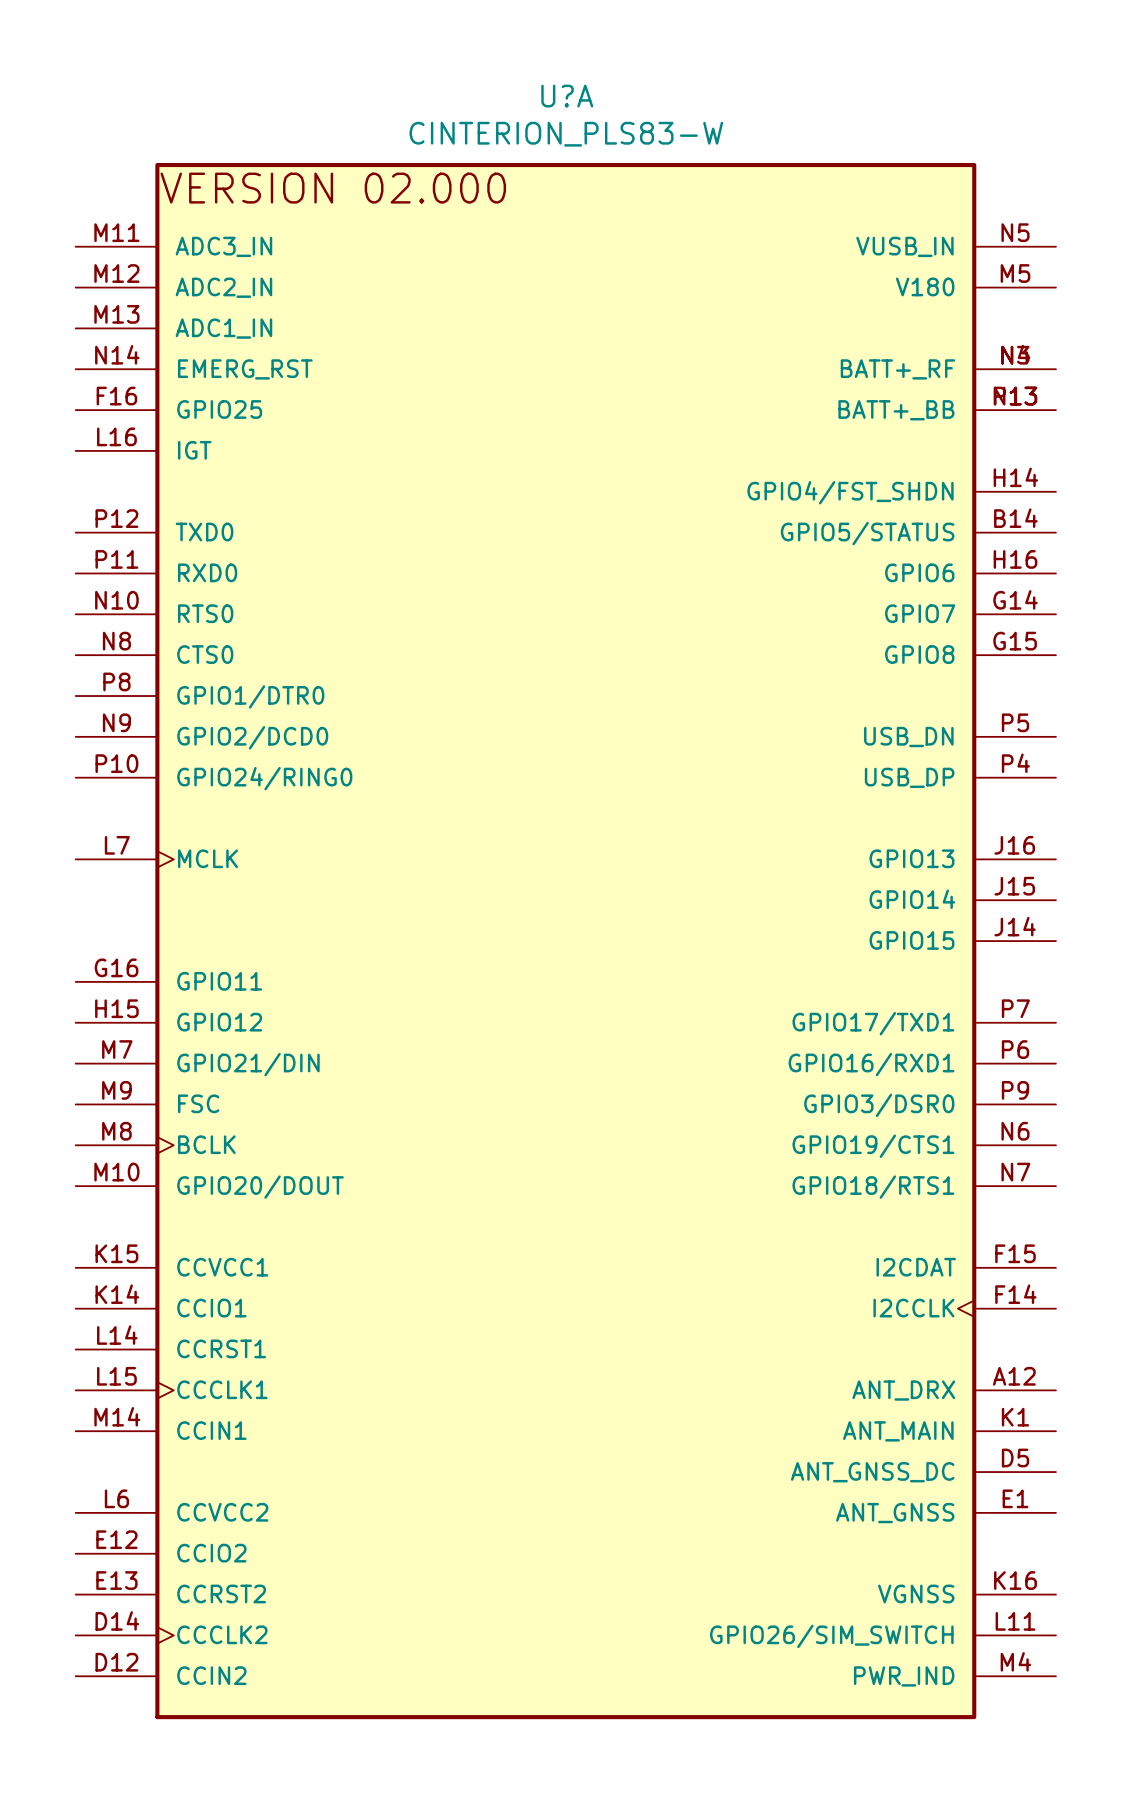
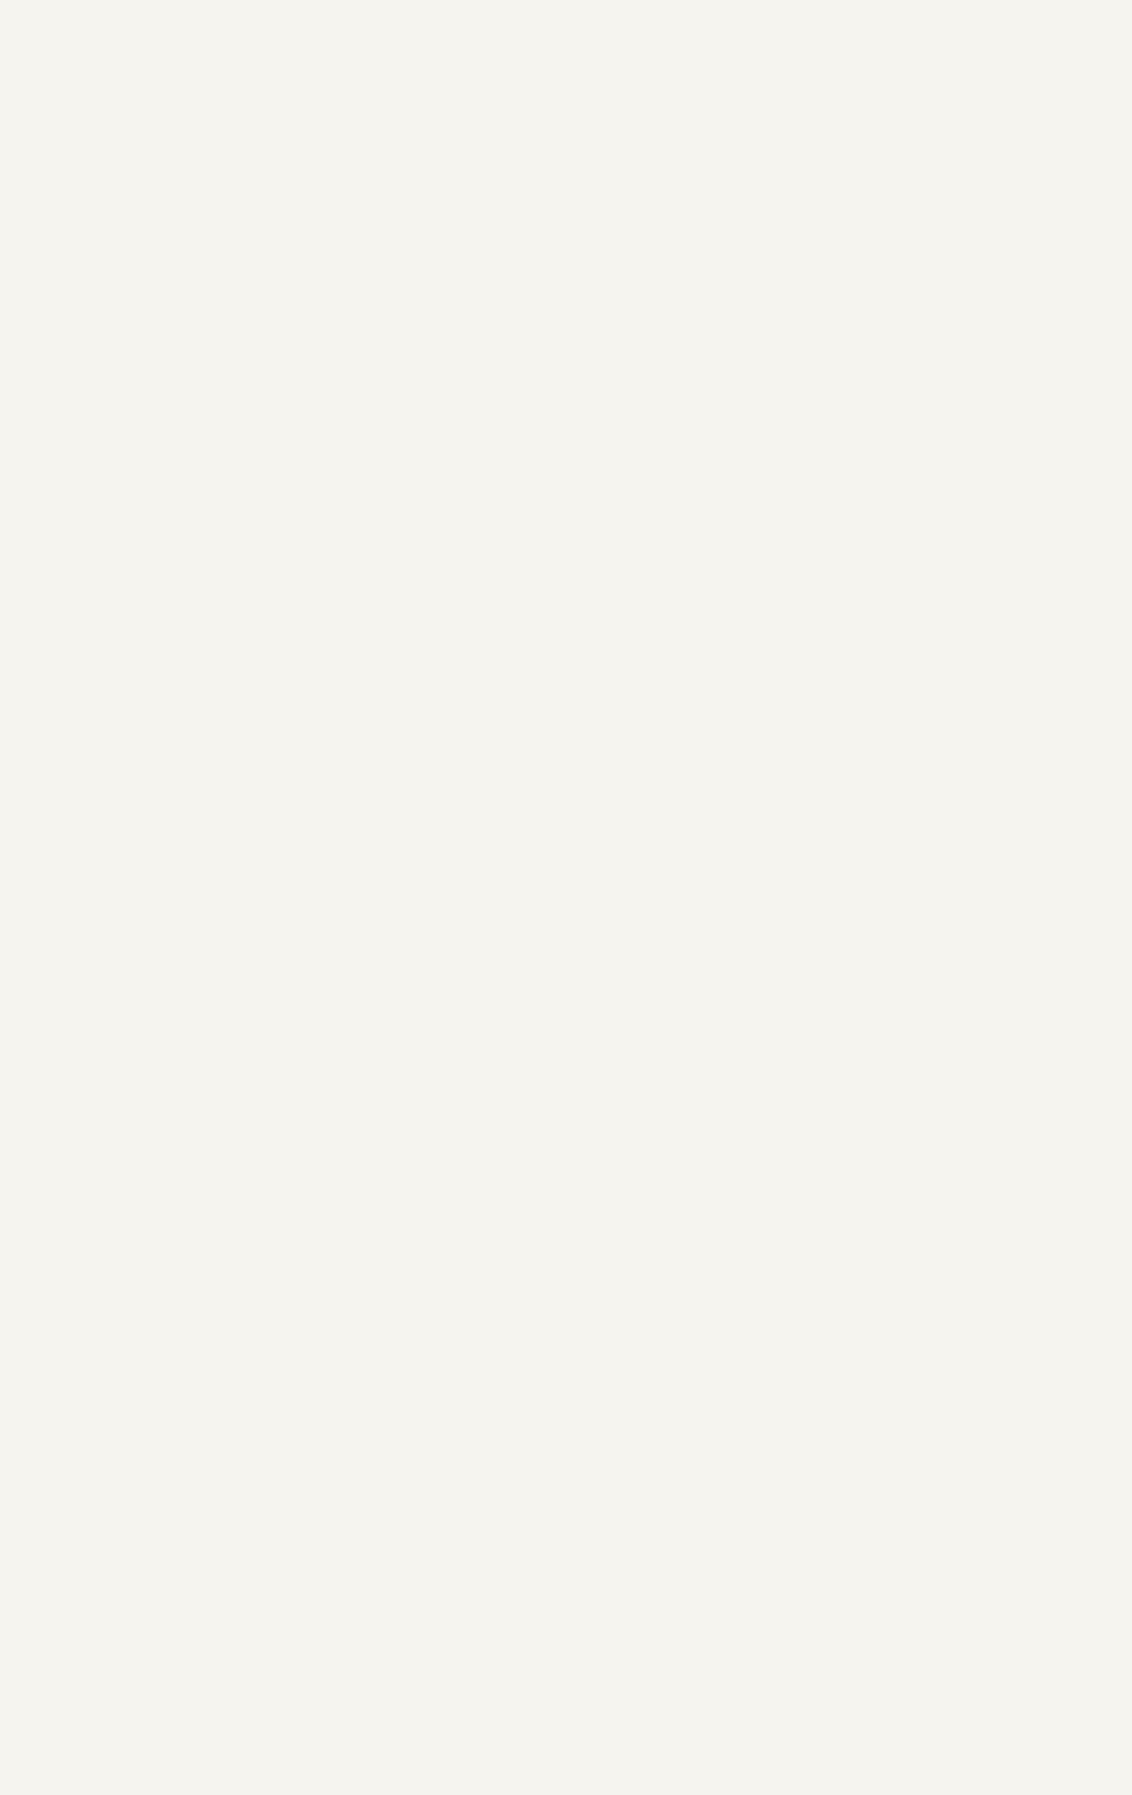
U?A: CINTERION_PLS83-W (565, 941) -> none

